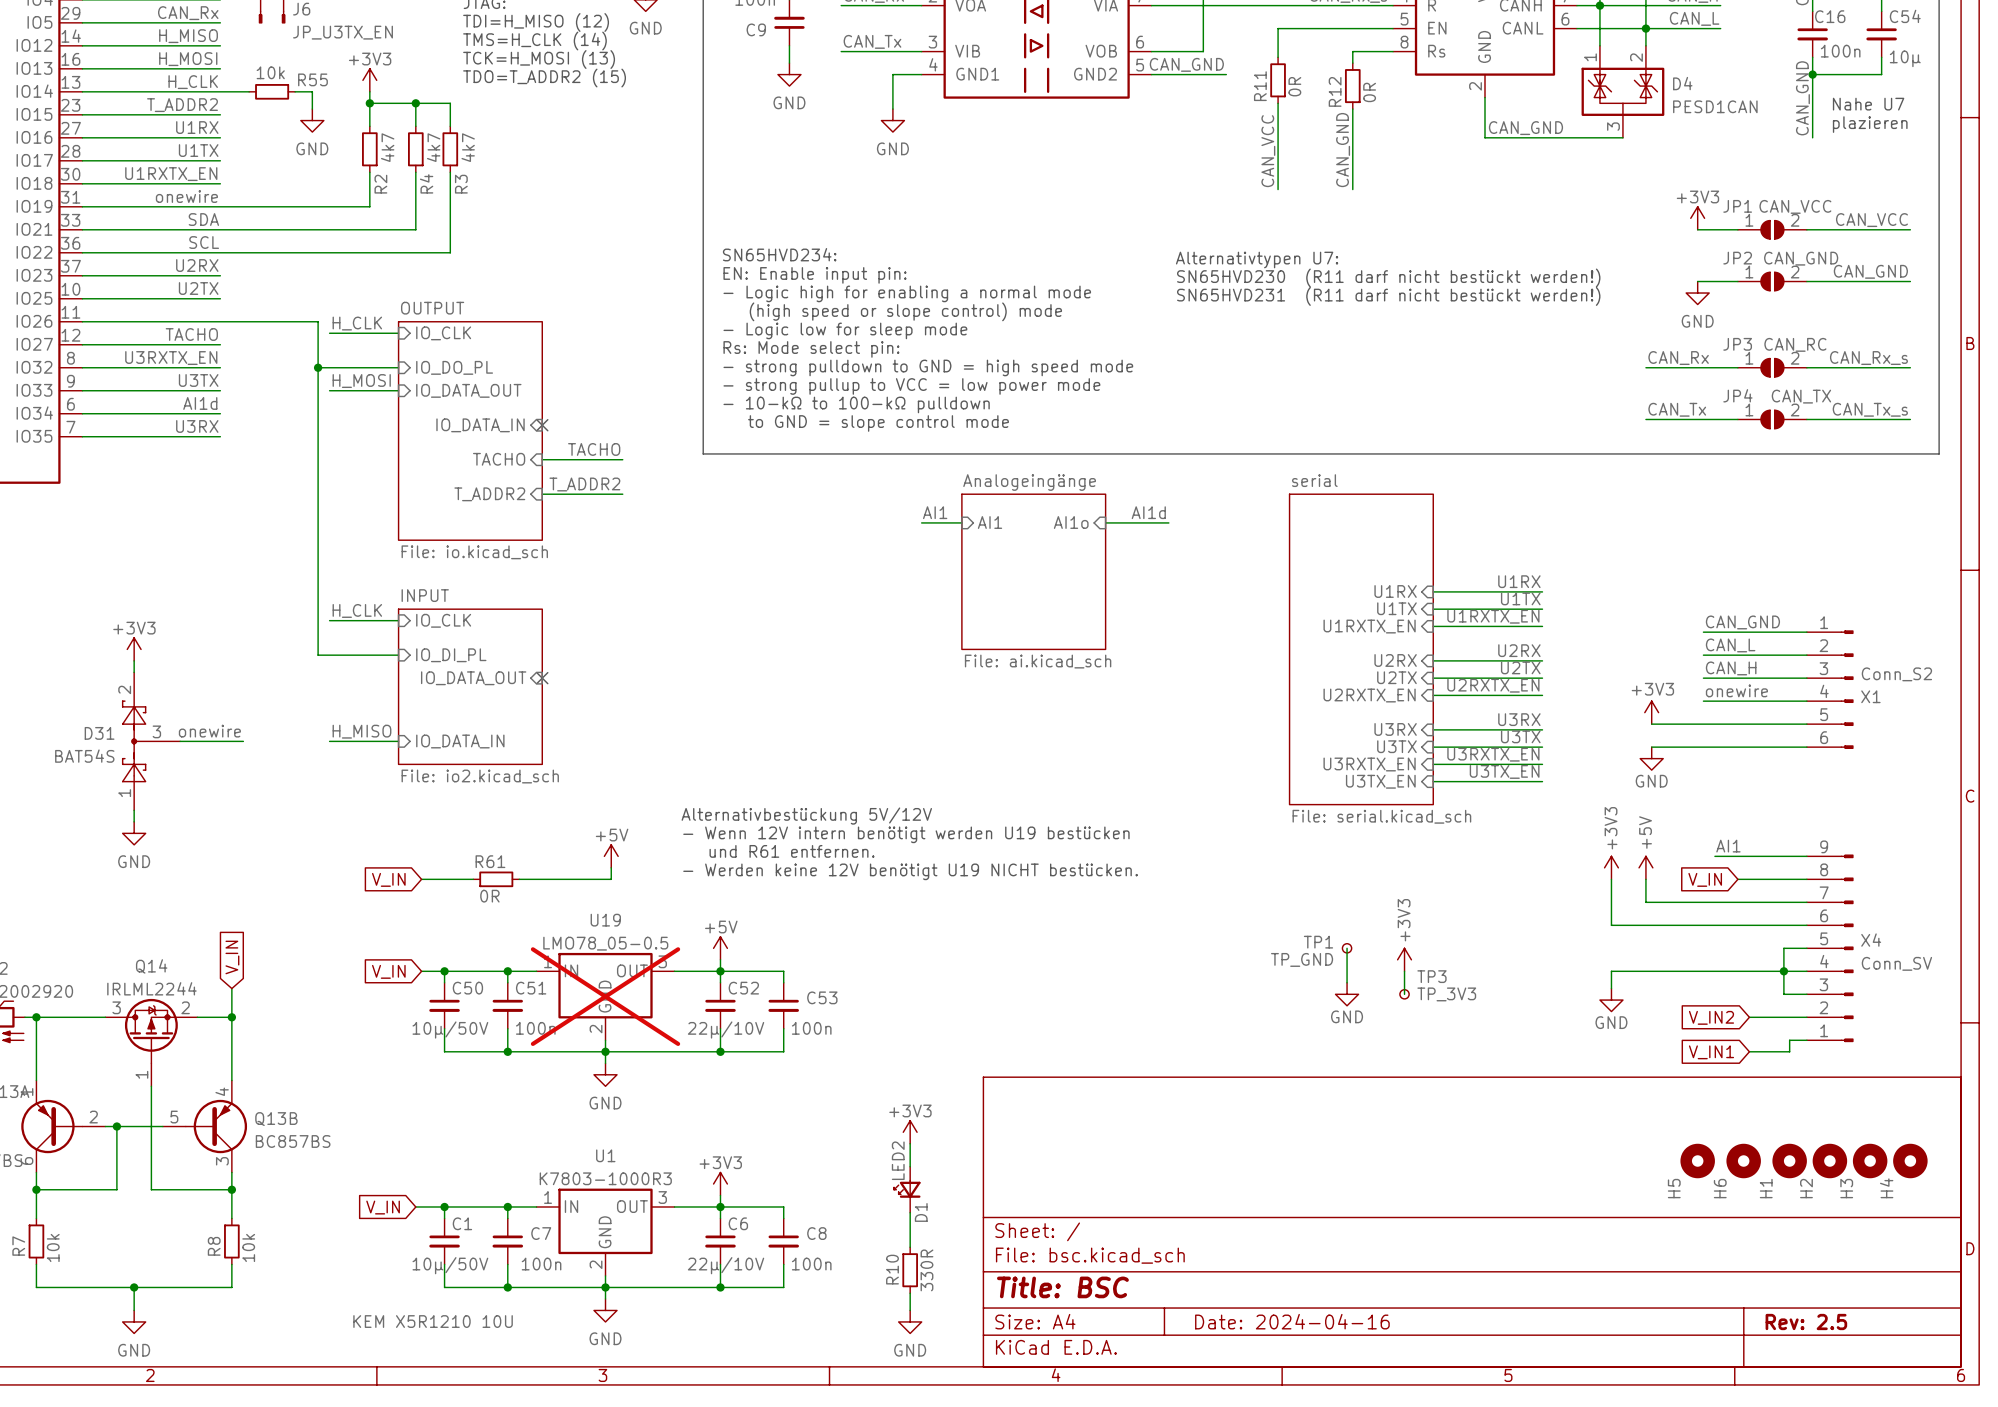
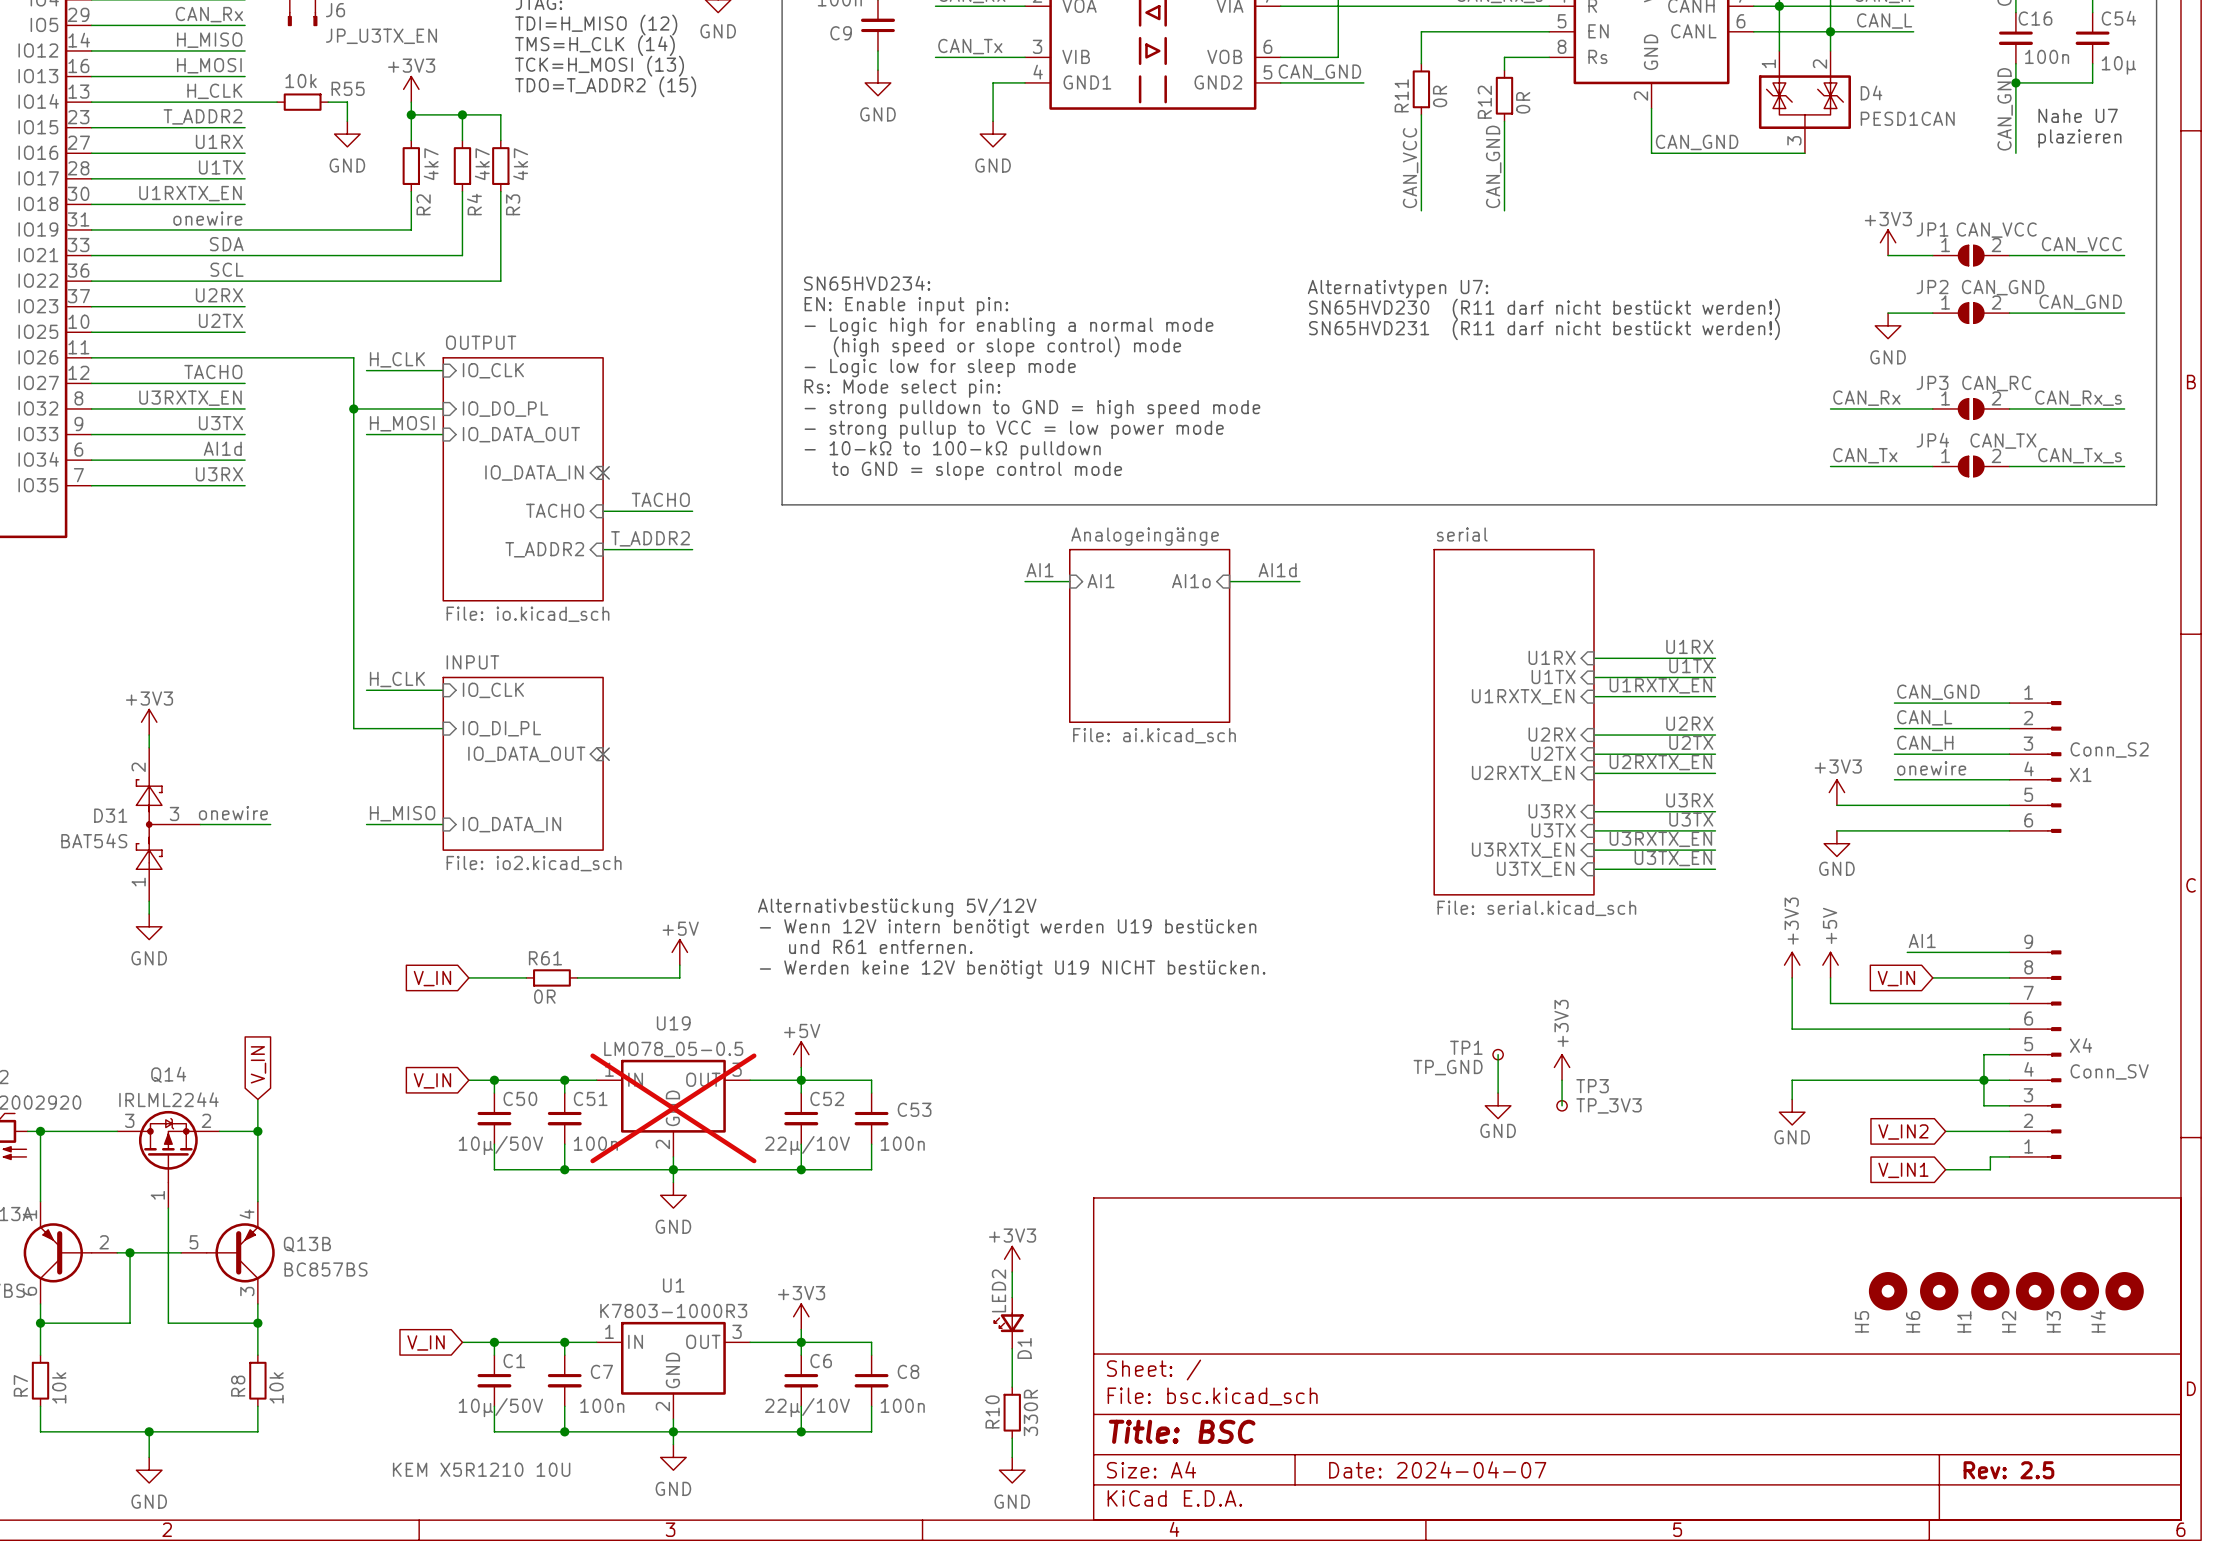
title block: Date: 2024-04-16 (1292, 1321) -> Date: 2024-04-07 (1437, 1469)

